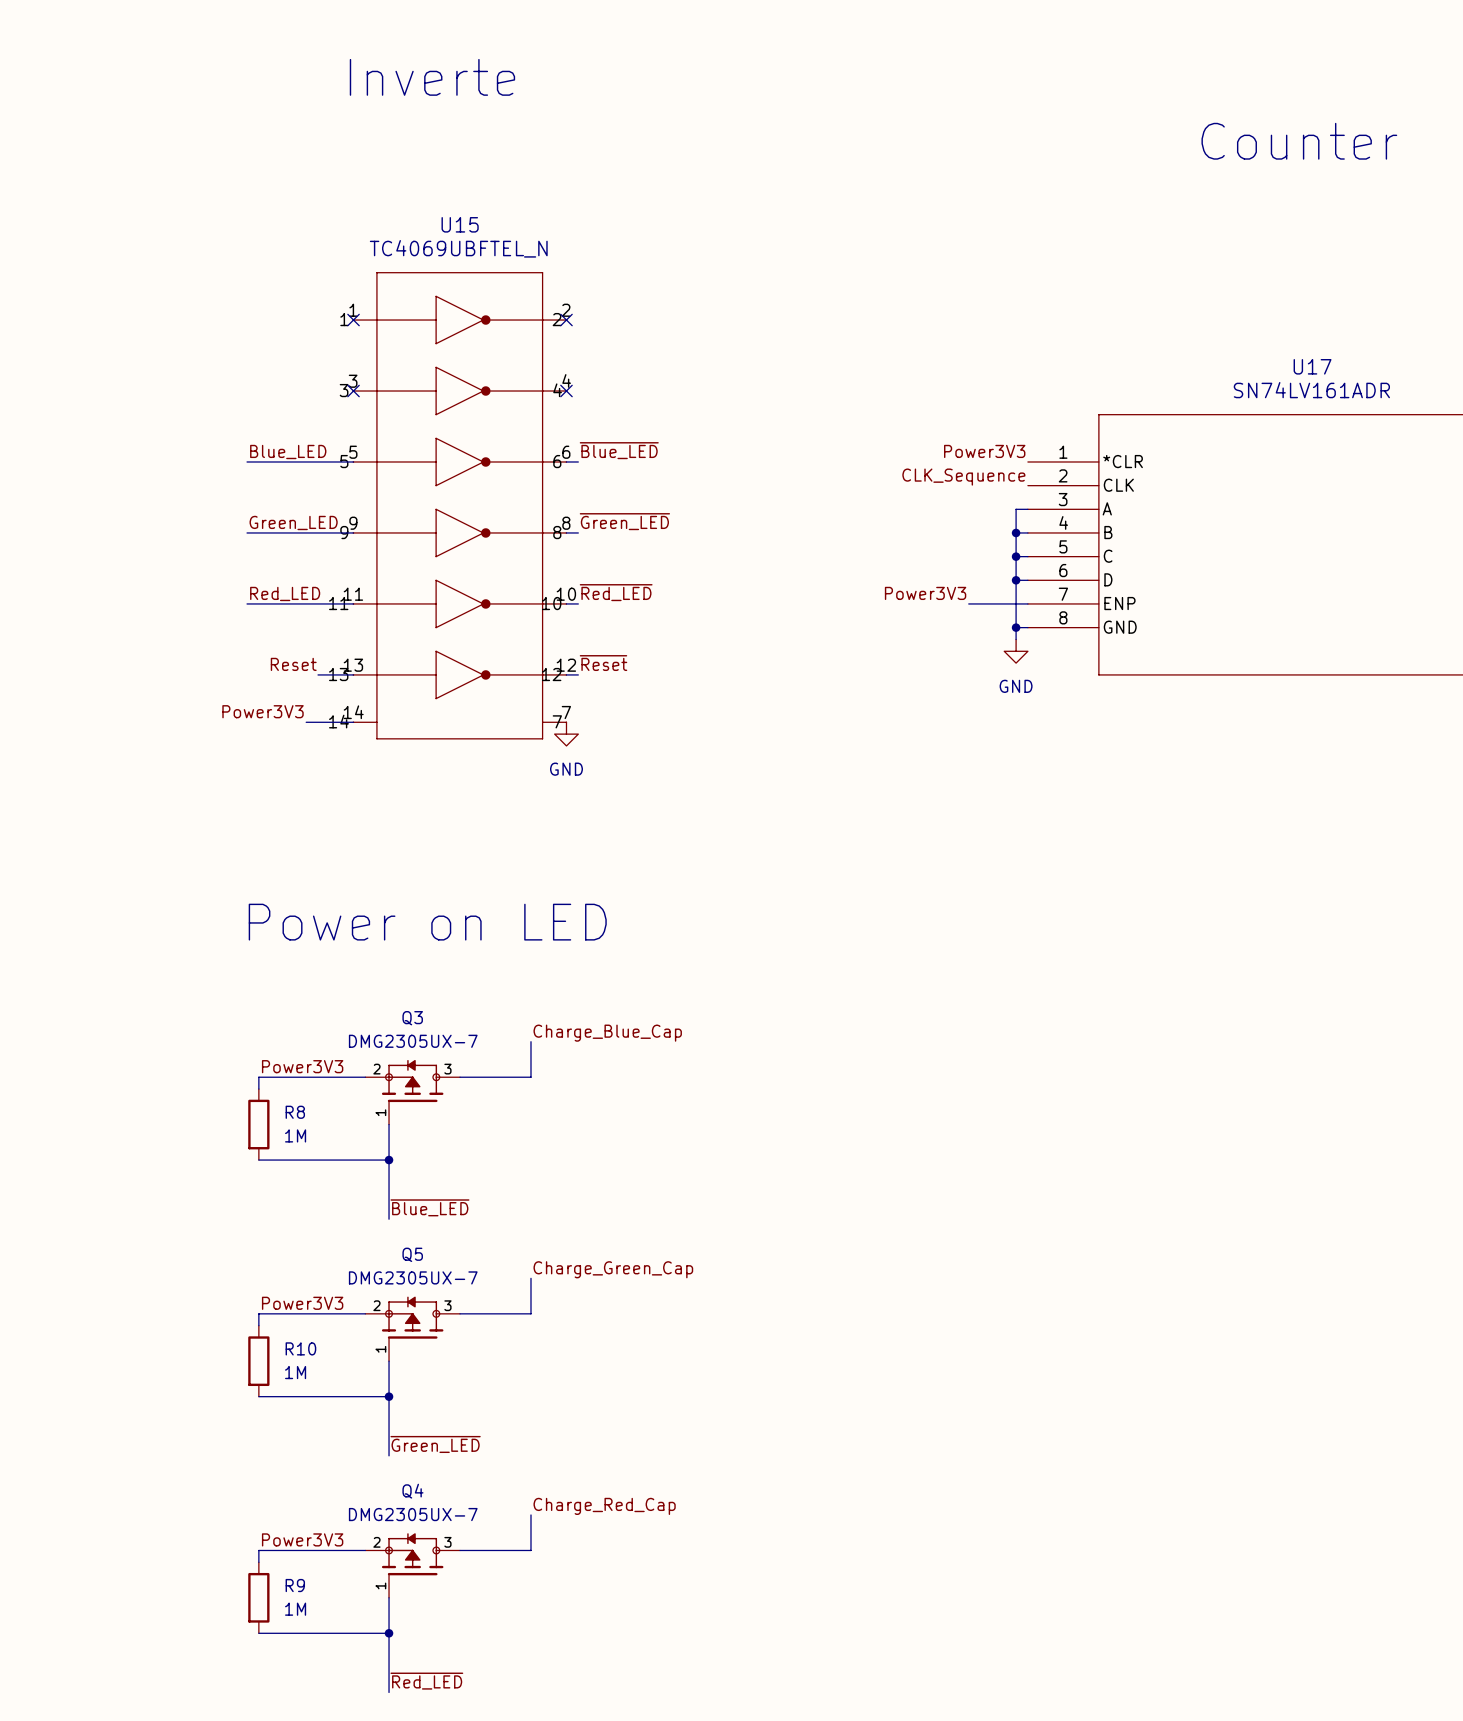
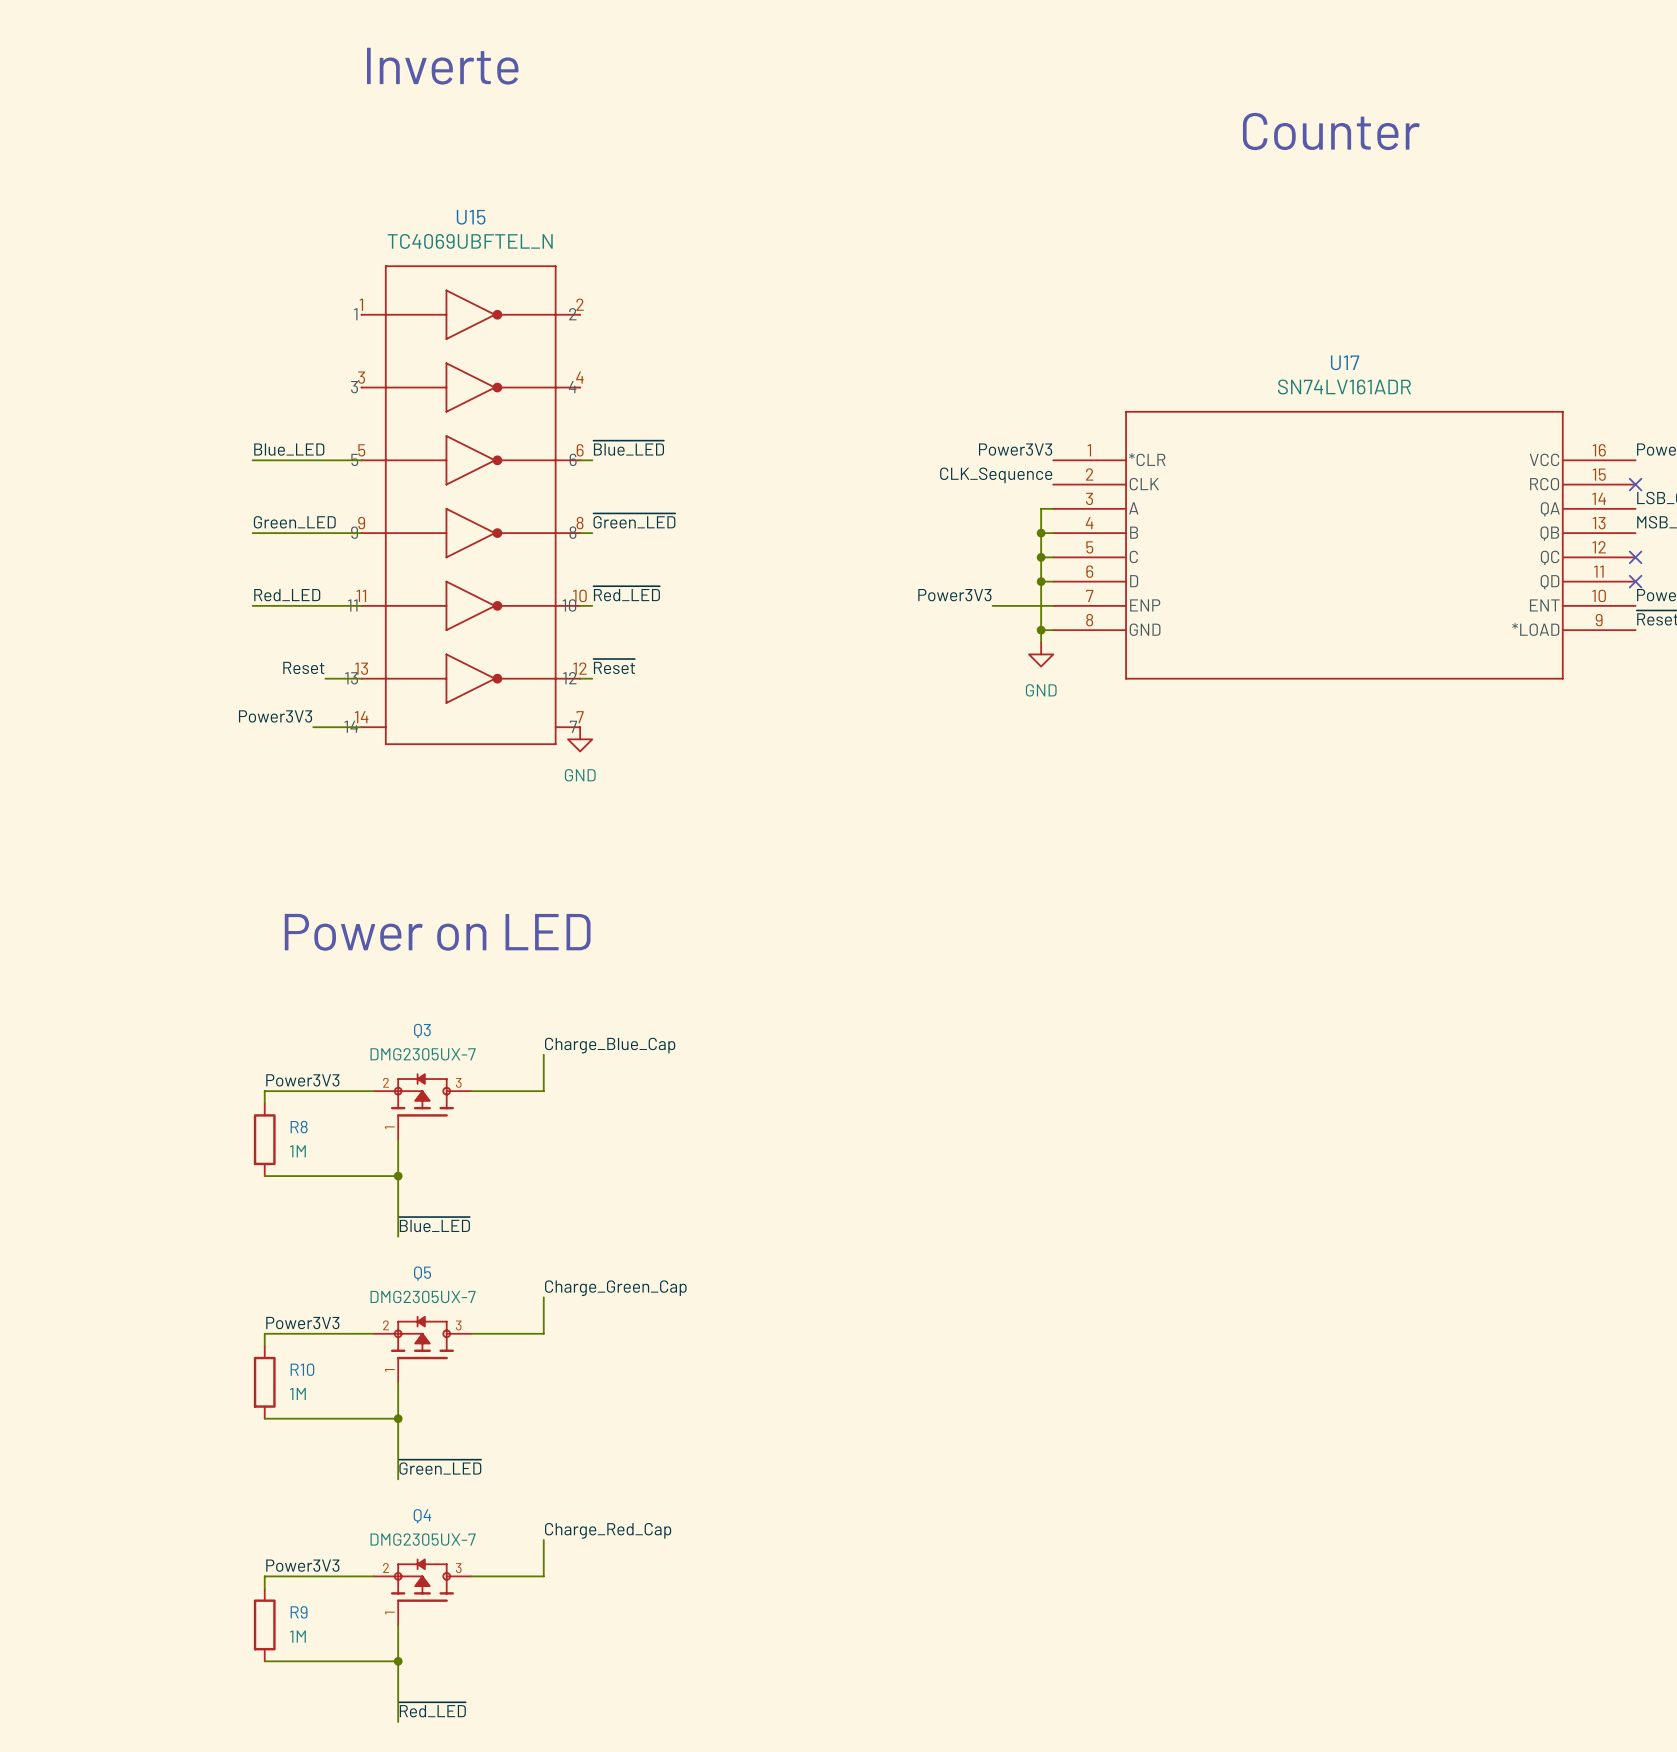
no-connect mark: (353, 320) -> none
no-connect mark: (566, 320) -> none
no-connect mark: (353, 391) -> none
no-connect mark: (566, 391) -> none

